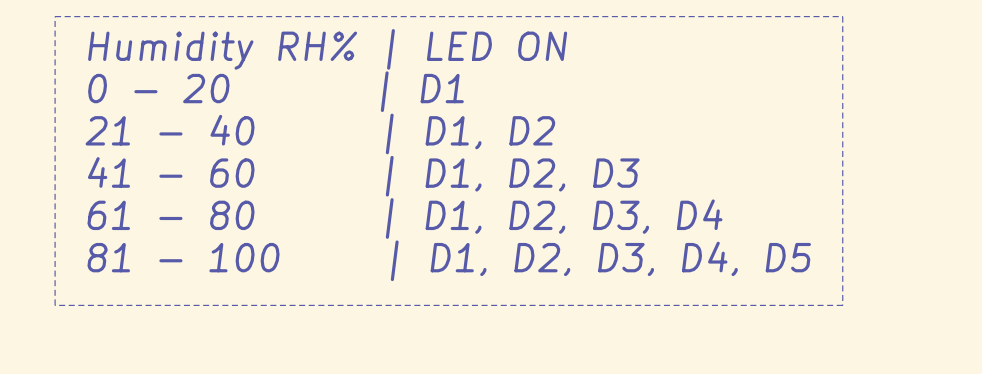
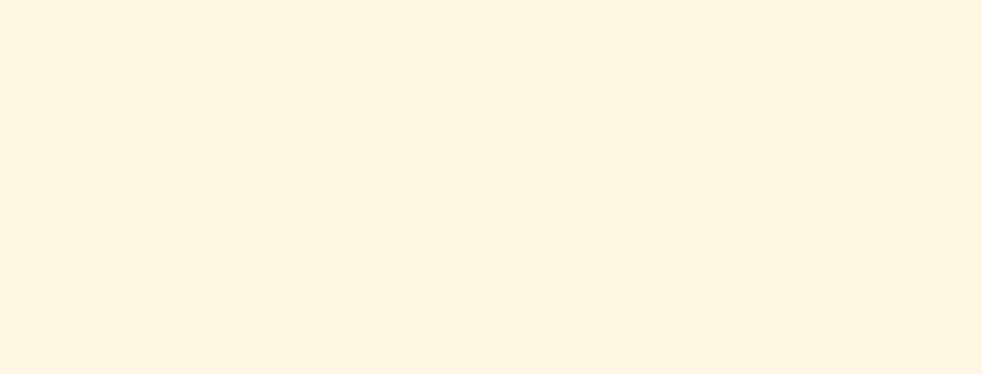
line: (55, 16) (842, 16) (842, 305) (55, 305) (55, 16) -> none
text: Humidity RH% | LED ON (327, 49) -> none
text: 0 - 20 | D1 (275, 91) -> none
text: 21 - 40 | D1, D2 (320, 133) -> none
text: 41 - 60 | D1, D2, D3 (363, 176) -> none
text: 61 - 80 | D1, D2, D3, D4 (404, 218) -> none
text: 81 - 100 | D1, D2, D3, D4, D5 (449, 260) -> none

